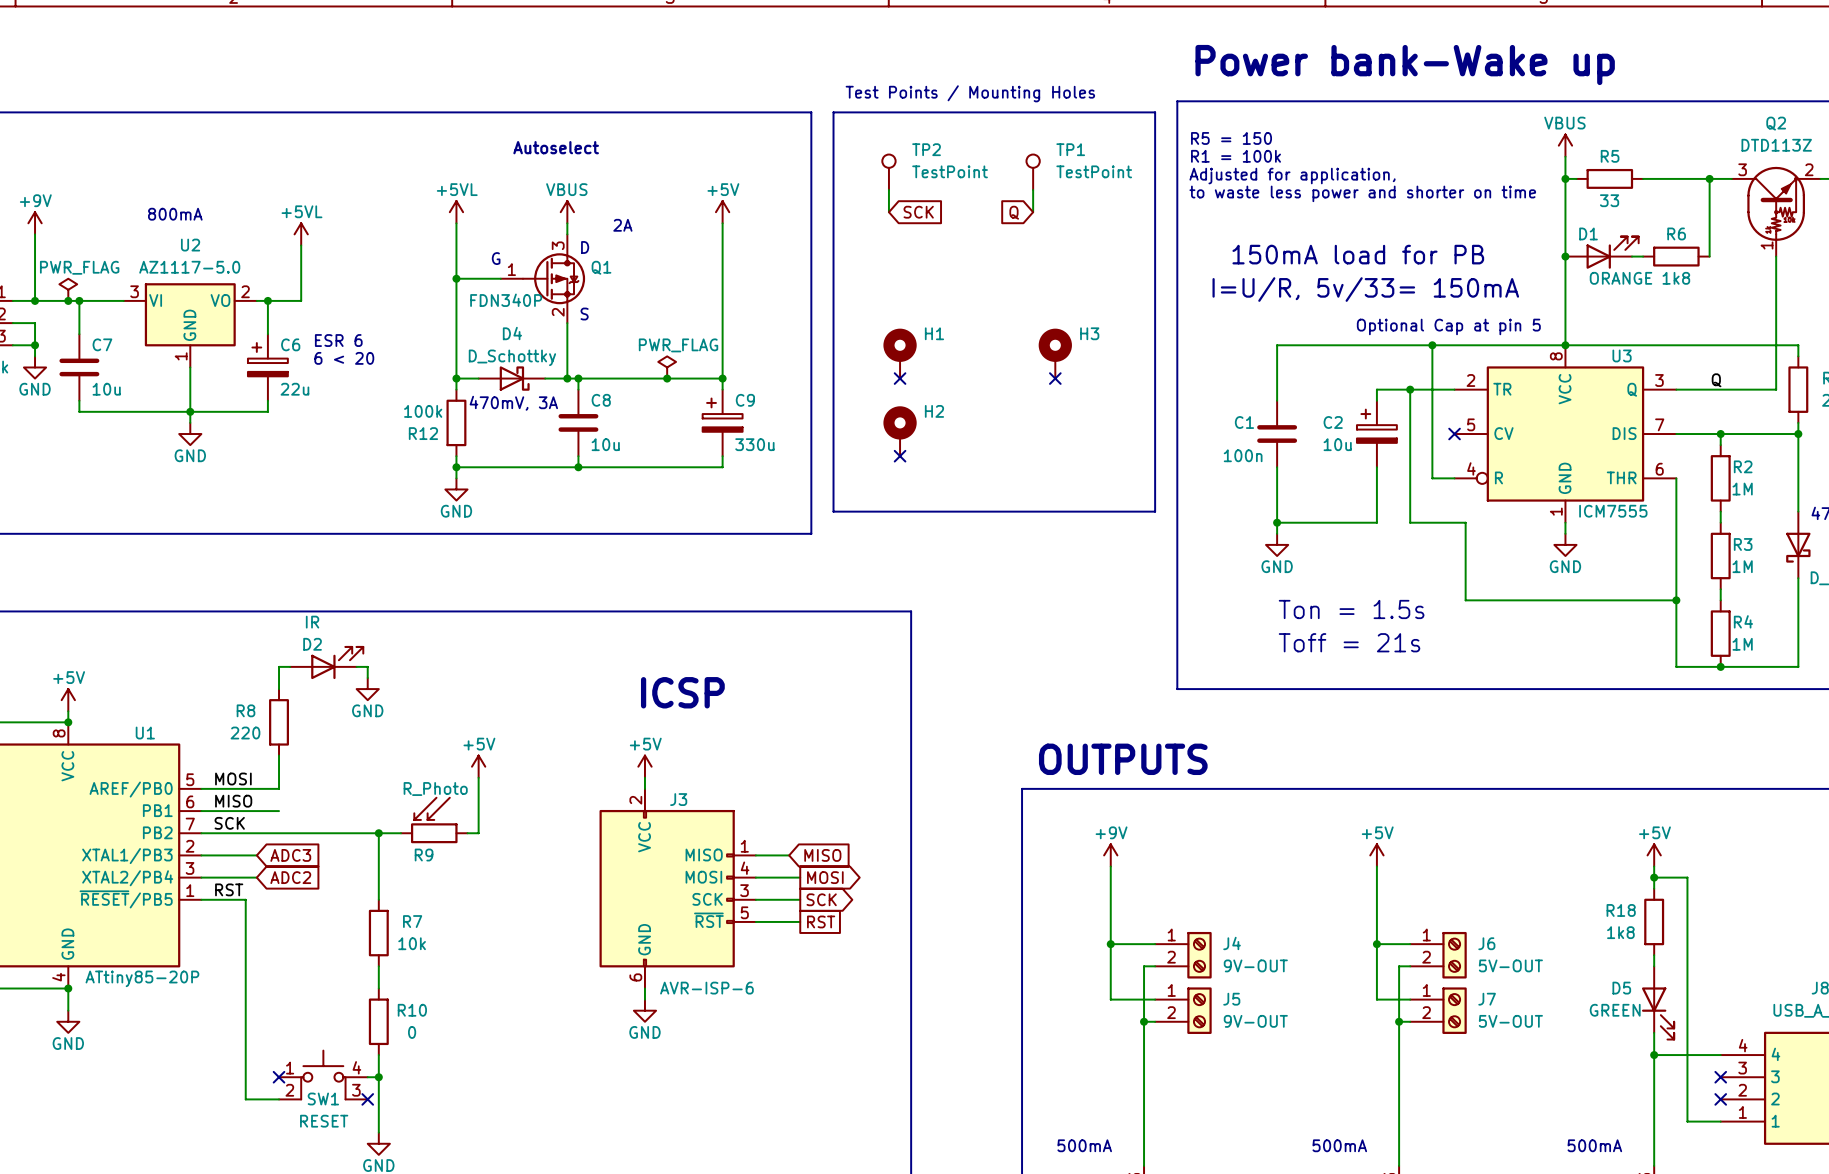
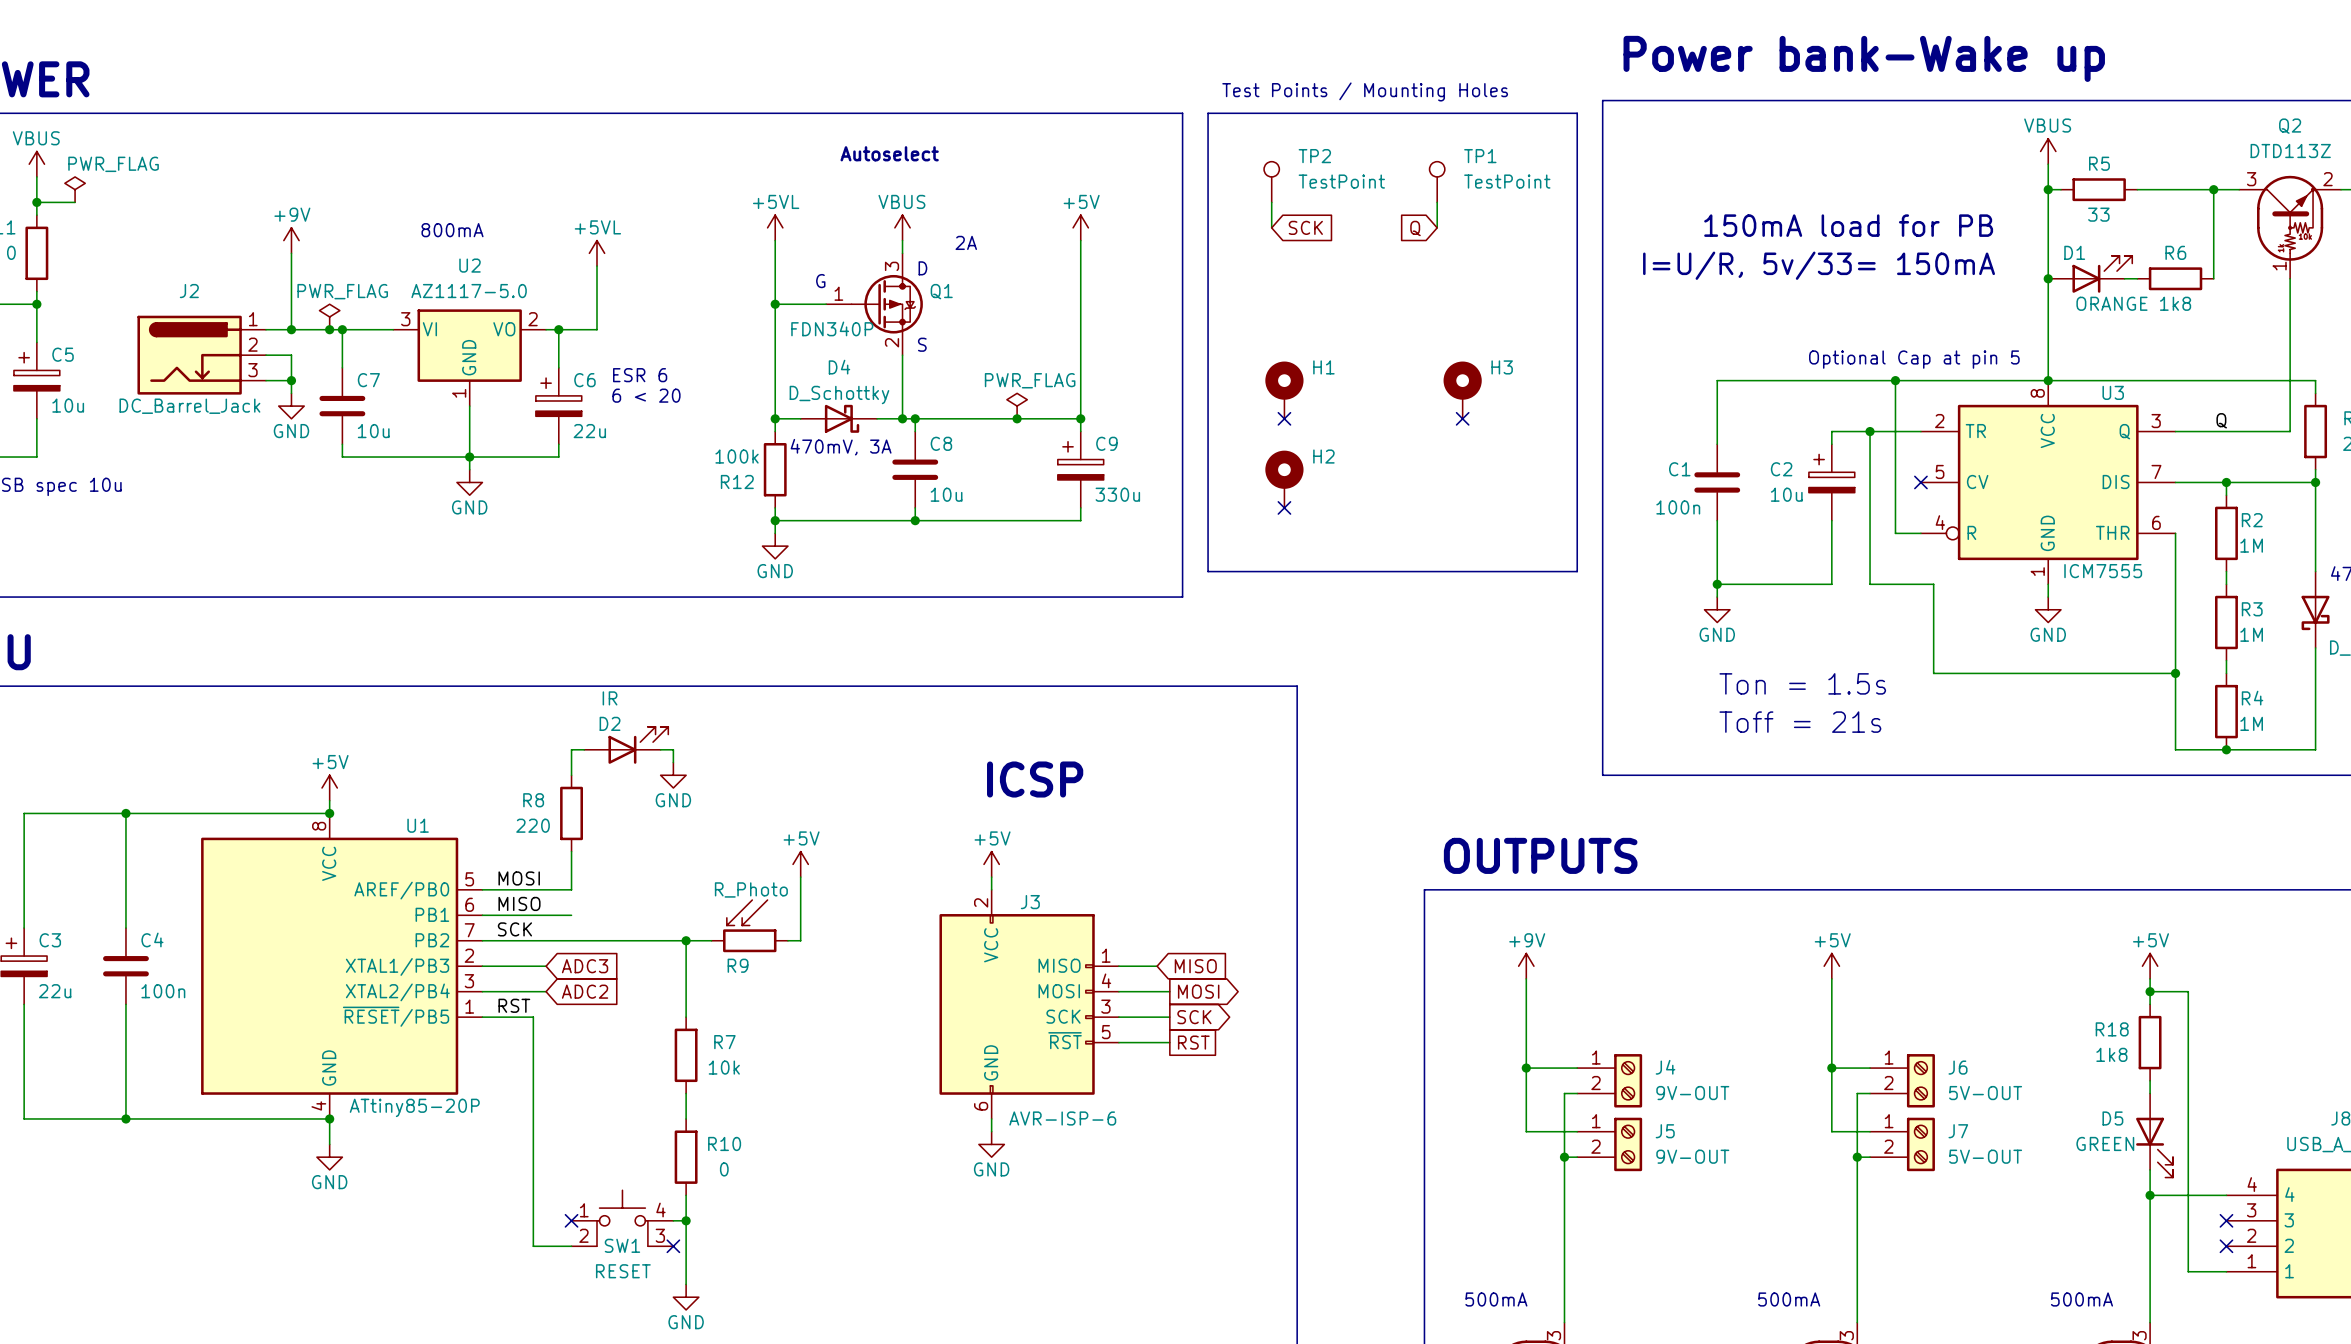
text: R5 = 150 (1231, 138) -> none
text: R1 = 100k (1236, 156) -> none
text: Adjusted for application, (1292, 176) -> none
text: to waste less power and shorter on time (1362, 193) -> none
text position: 150mA load for PB (1358, 254) -> 150mA load for PB (1848, 225)
text position: I=U/R, 5v/33= 150mA (1365, 289) -> I=U/R, 5v/33= 150mA (1819, 265)

